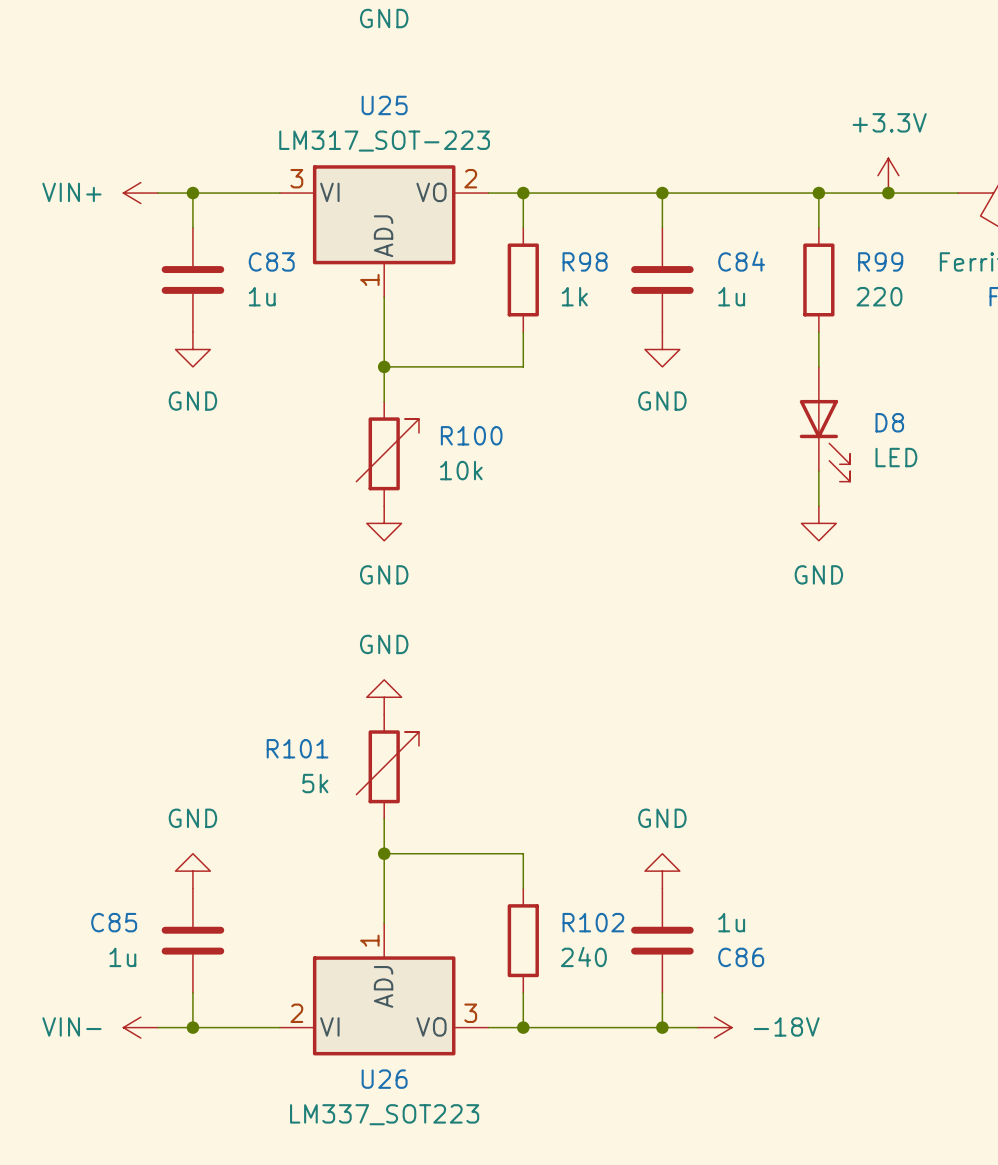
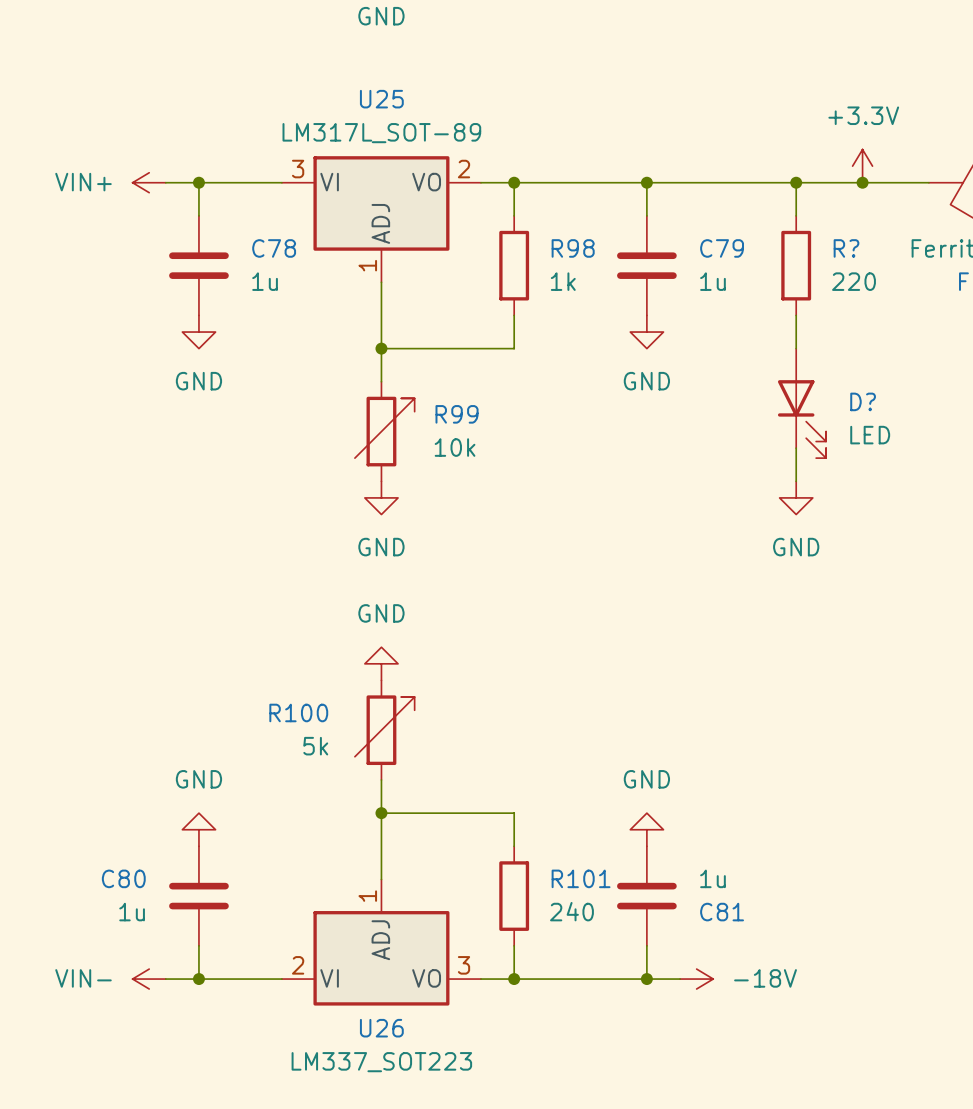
U25 value: LM317_SOT-223 (384, 141) -> LM317L_SOT-89 (381, 133)
C83 name: C83 (271, 261) -> C78 (274, 248)
C84 name: C84 (741, 261) -> C79 (722, 248)
R99 name: R99 (880, 261) -> R? (846, 248)
D8 name: D8 (889, 422) -> D? (863, 401)
R100 name: R100 (471, 435) -> R99 (457, 414)
R101 name: R101 (297, 748) -> R100 (298, 712)
C85 name: C85 (114, 922) -> C80 (123, 878)
R102 name: R102 (593, 922) -> R101 (581, 878)
C86 name: C86 (741, 957) -> C81 (722, 912)

